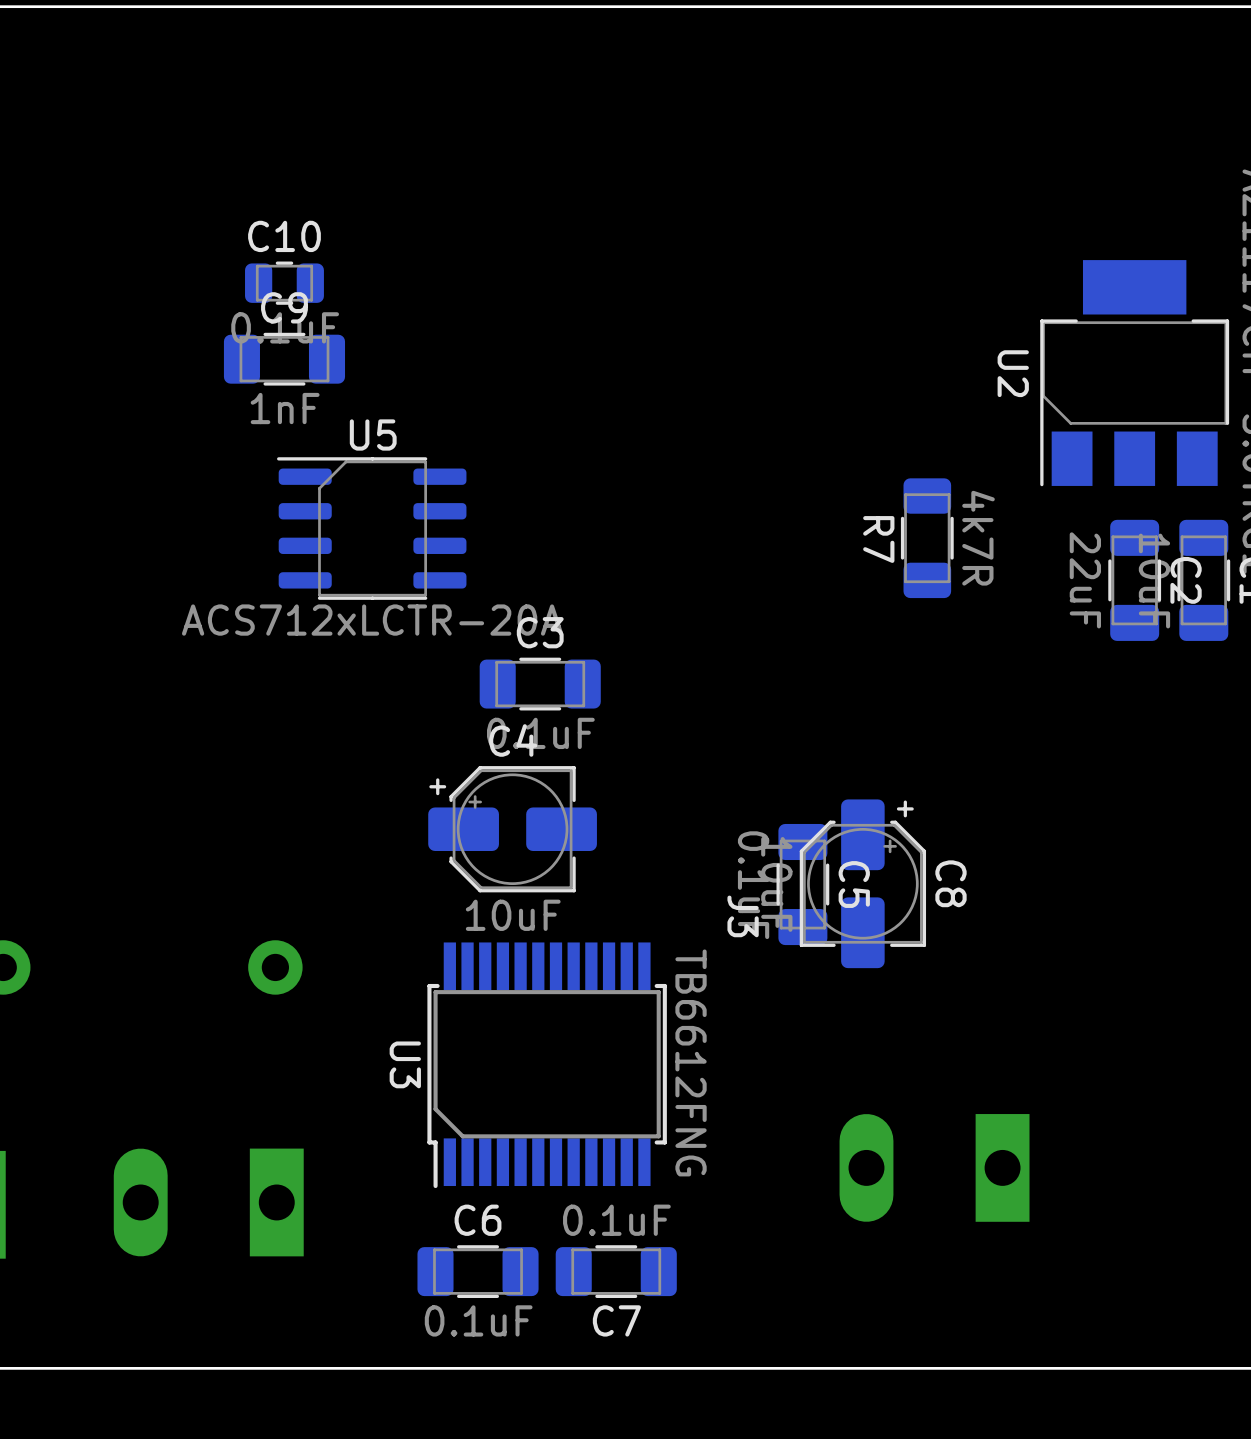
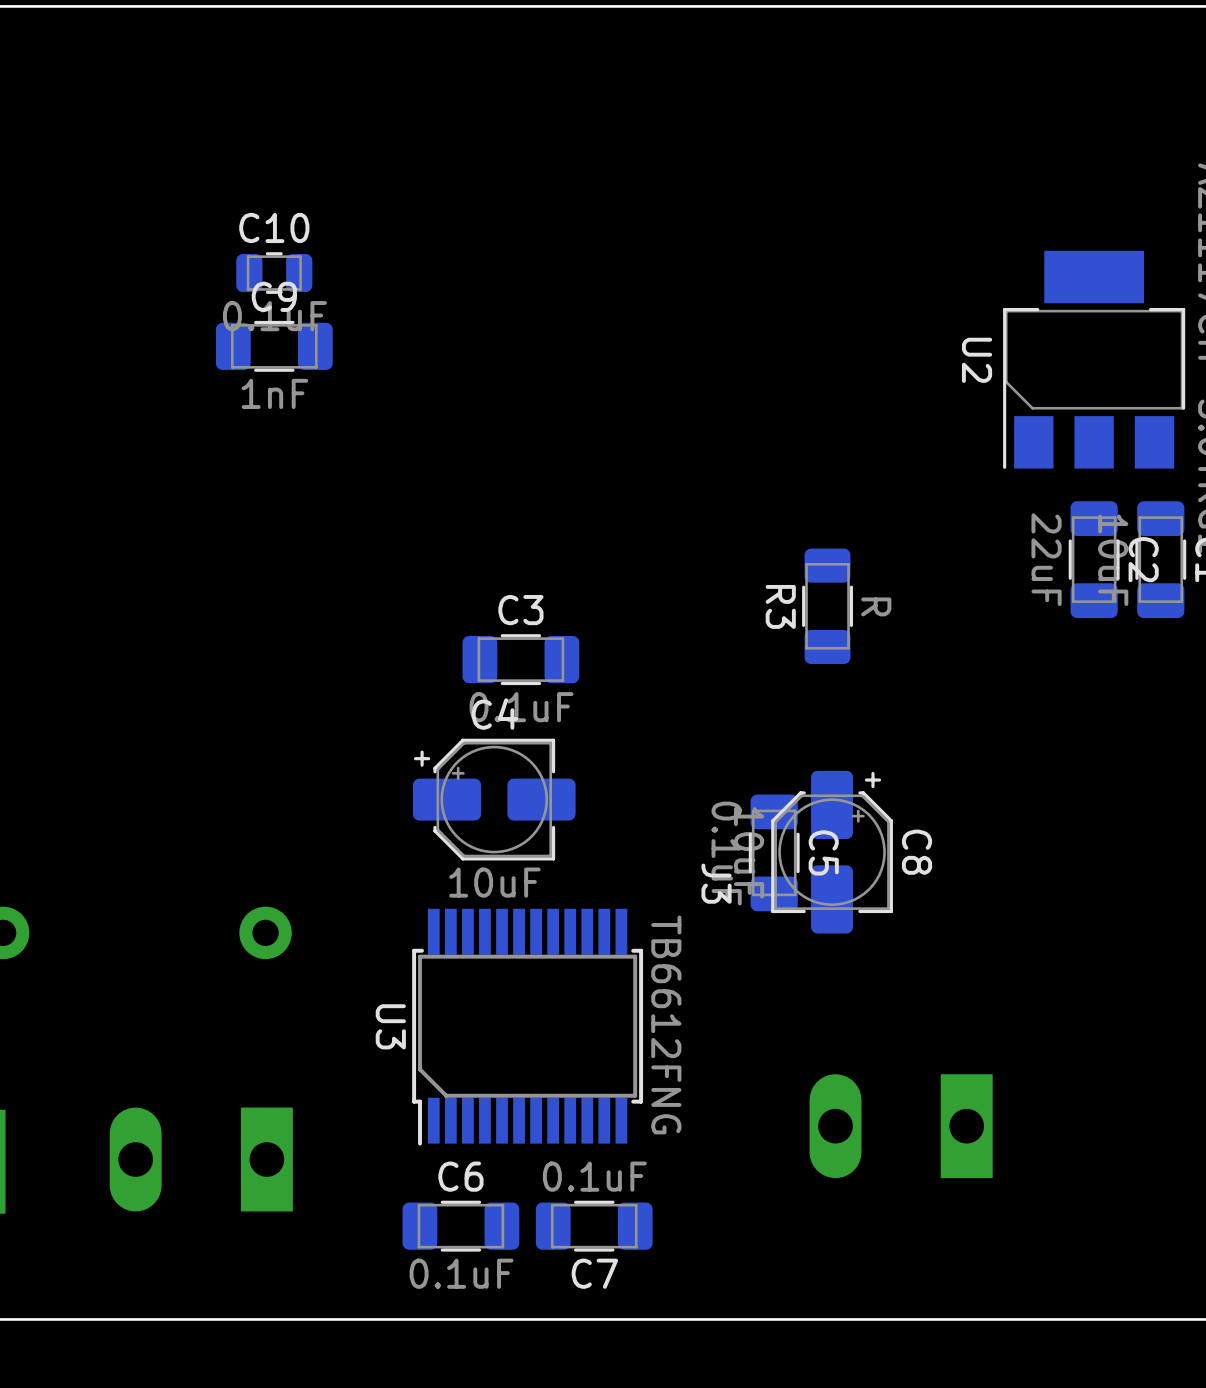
U5: ACS712xLCTR-20A (371, 528) -> none
R7: 4k7R (927, 538) -> none
R3: none -> R (827, 606)

